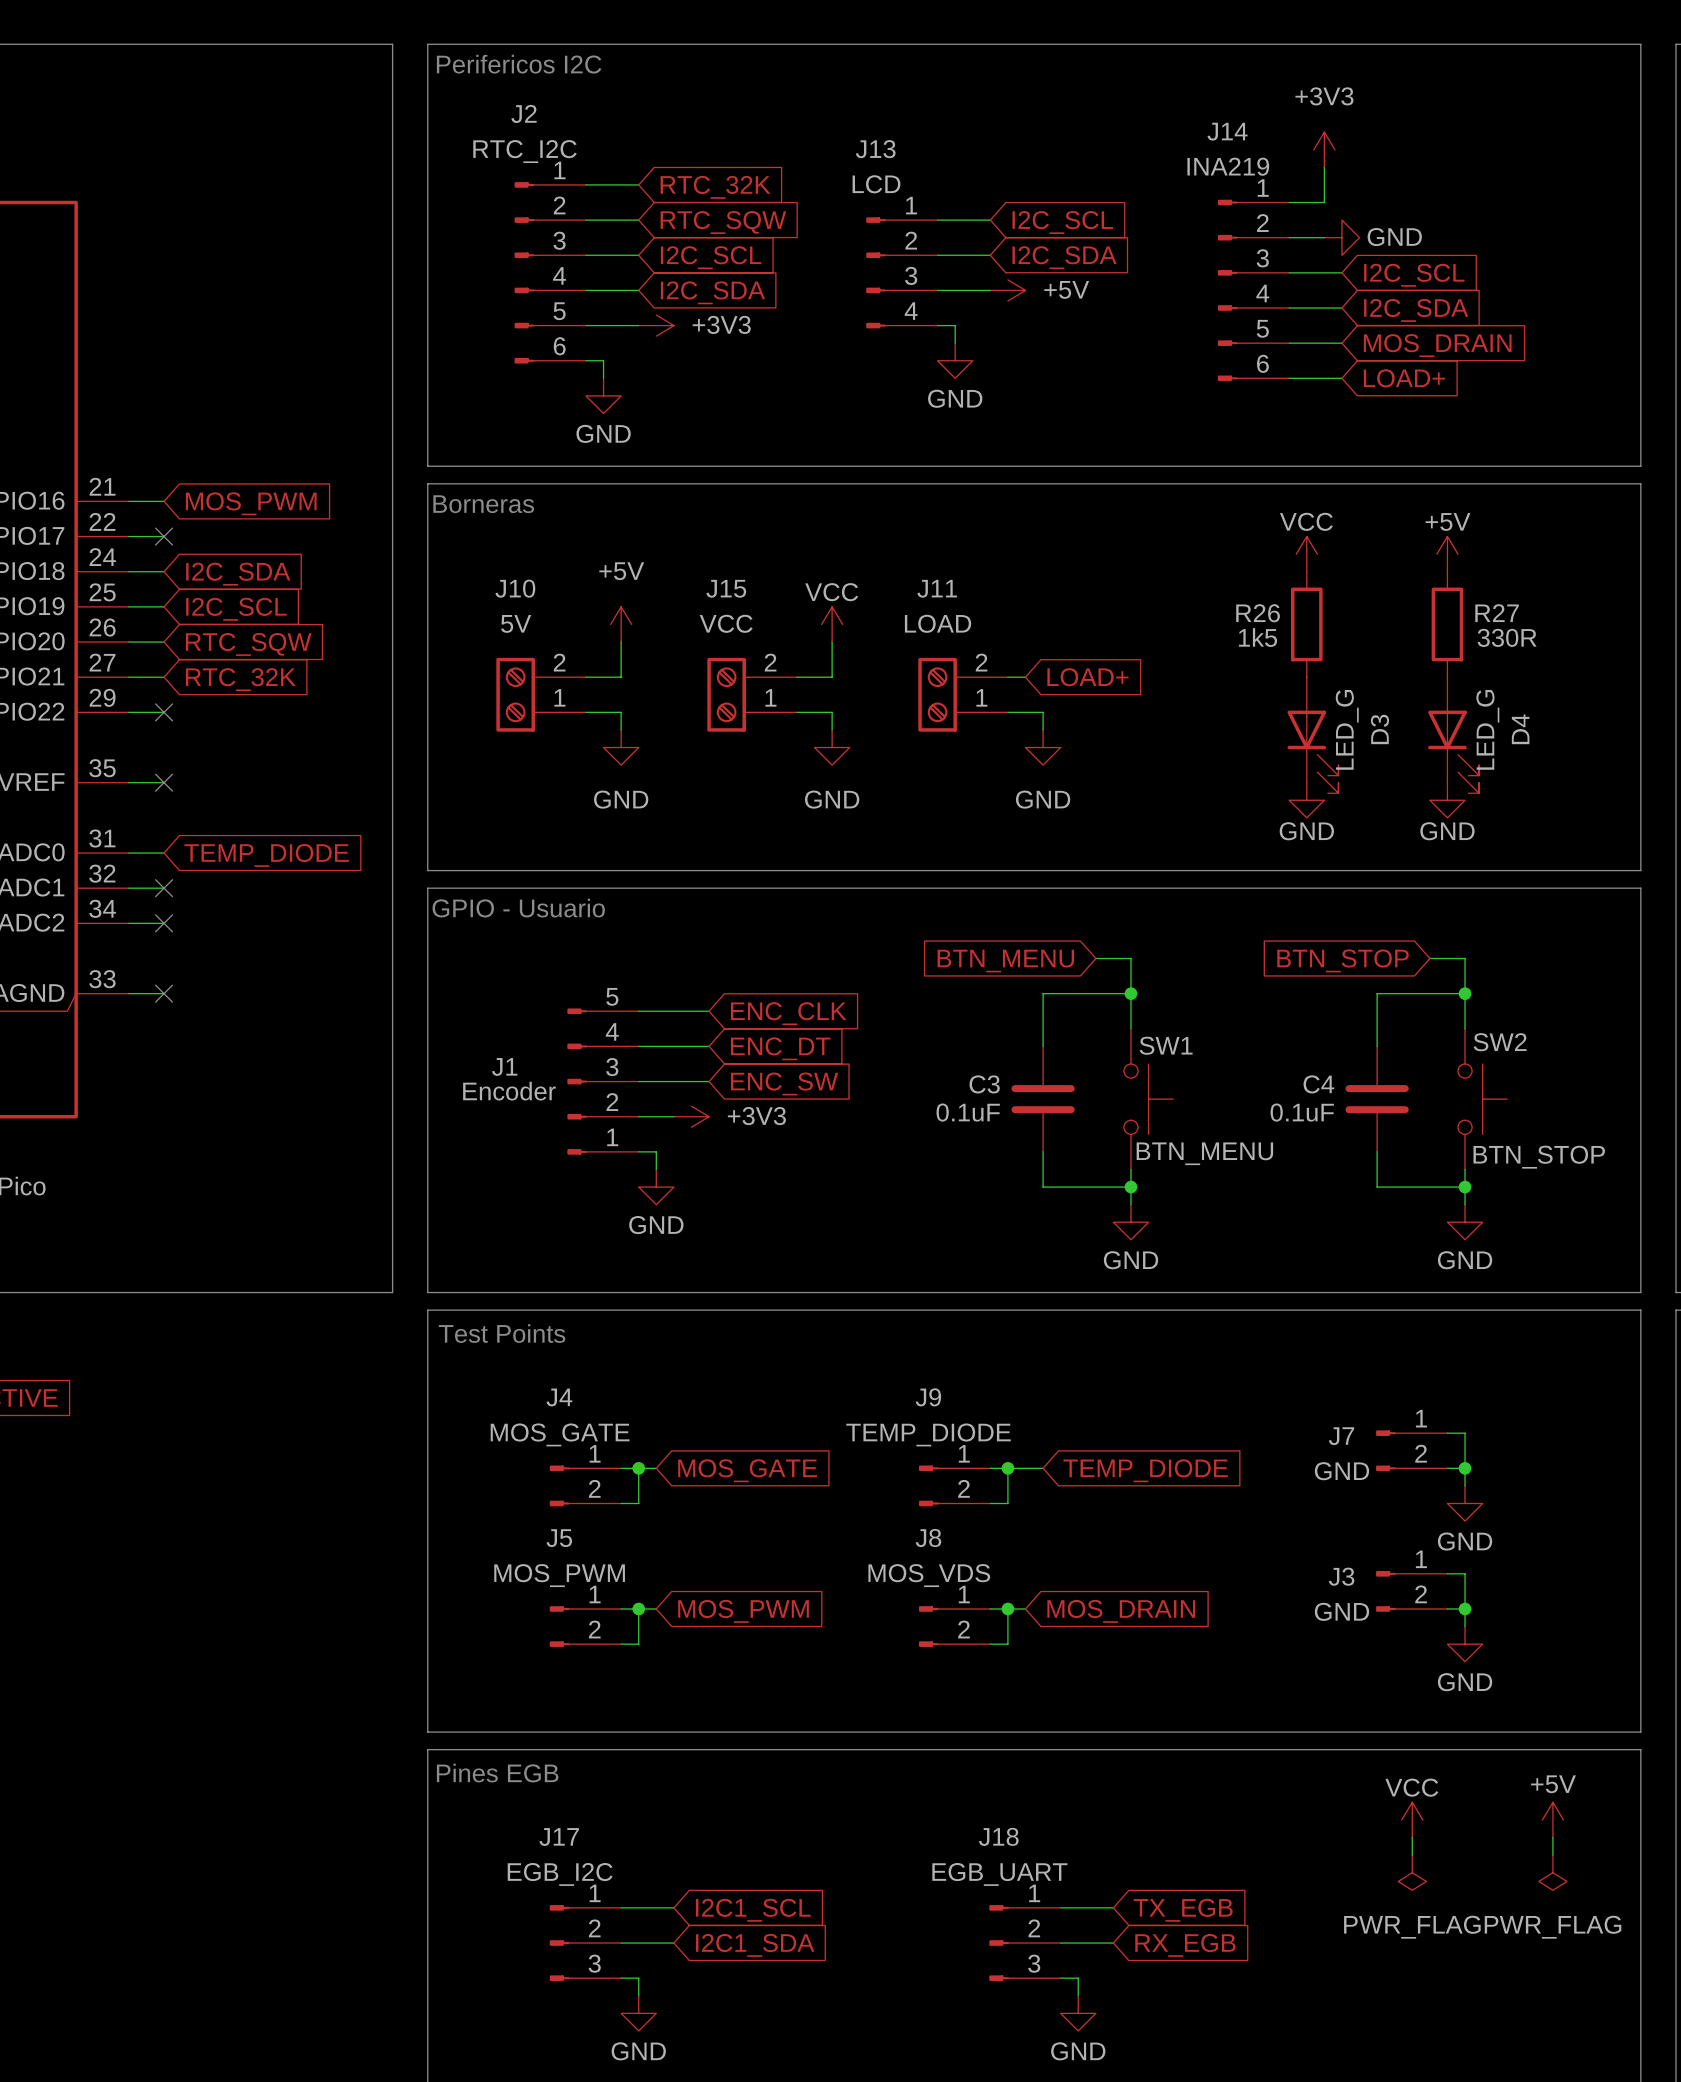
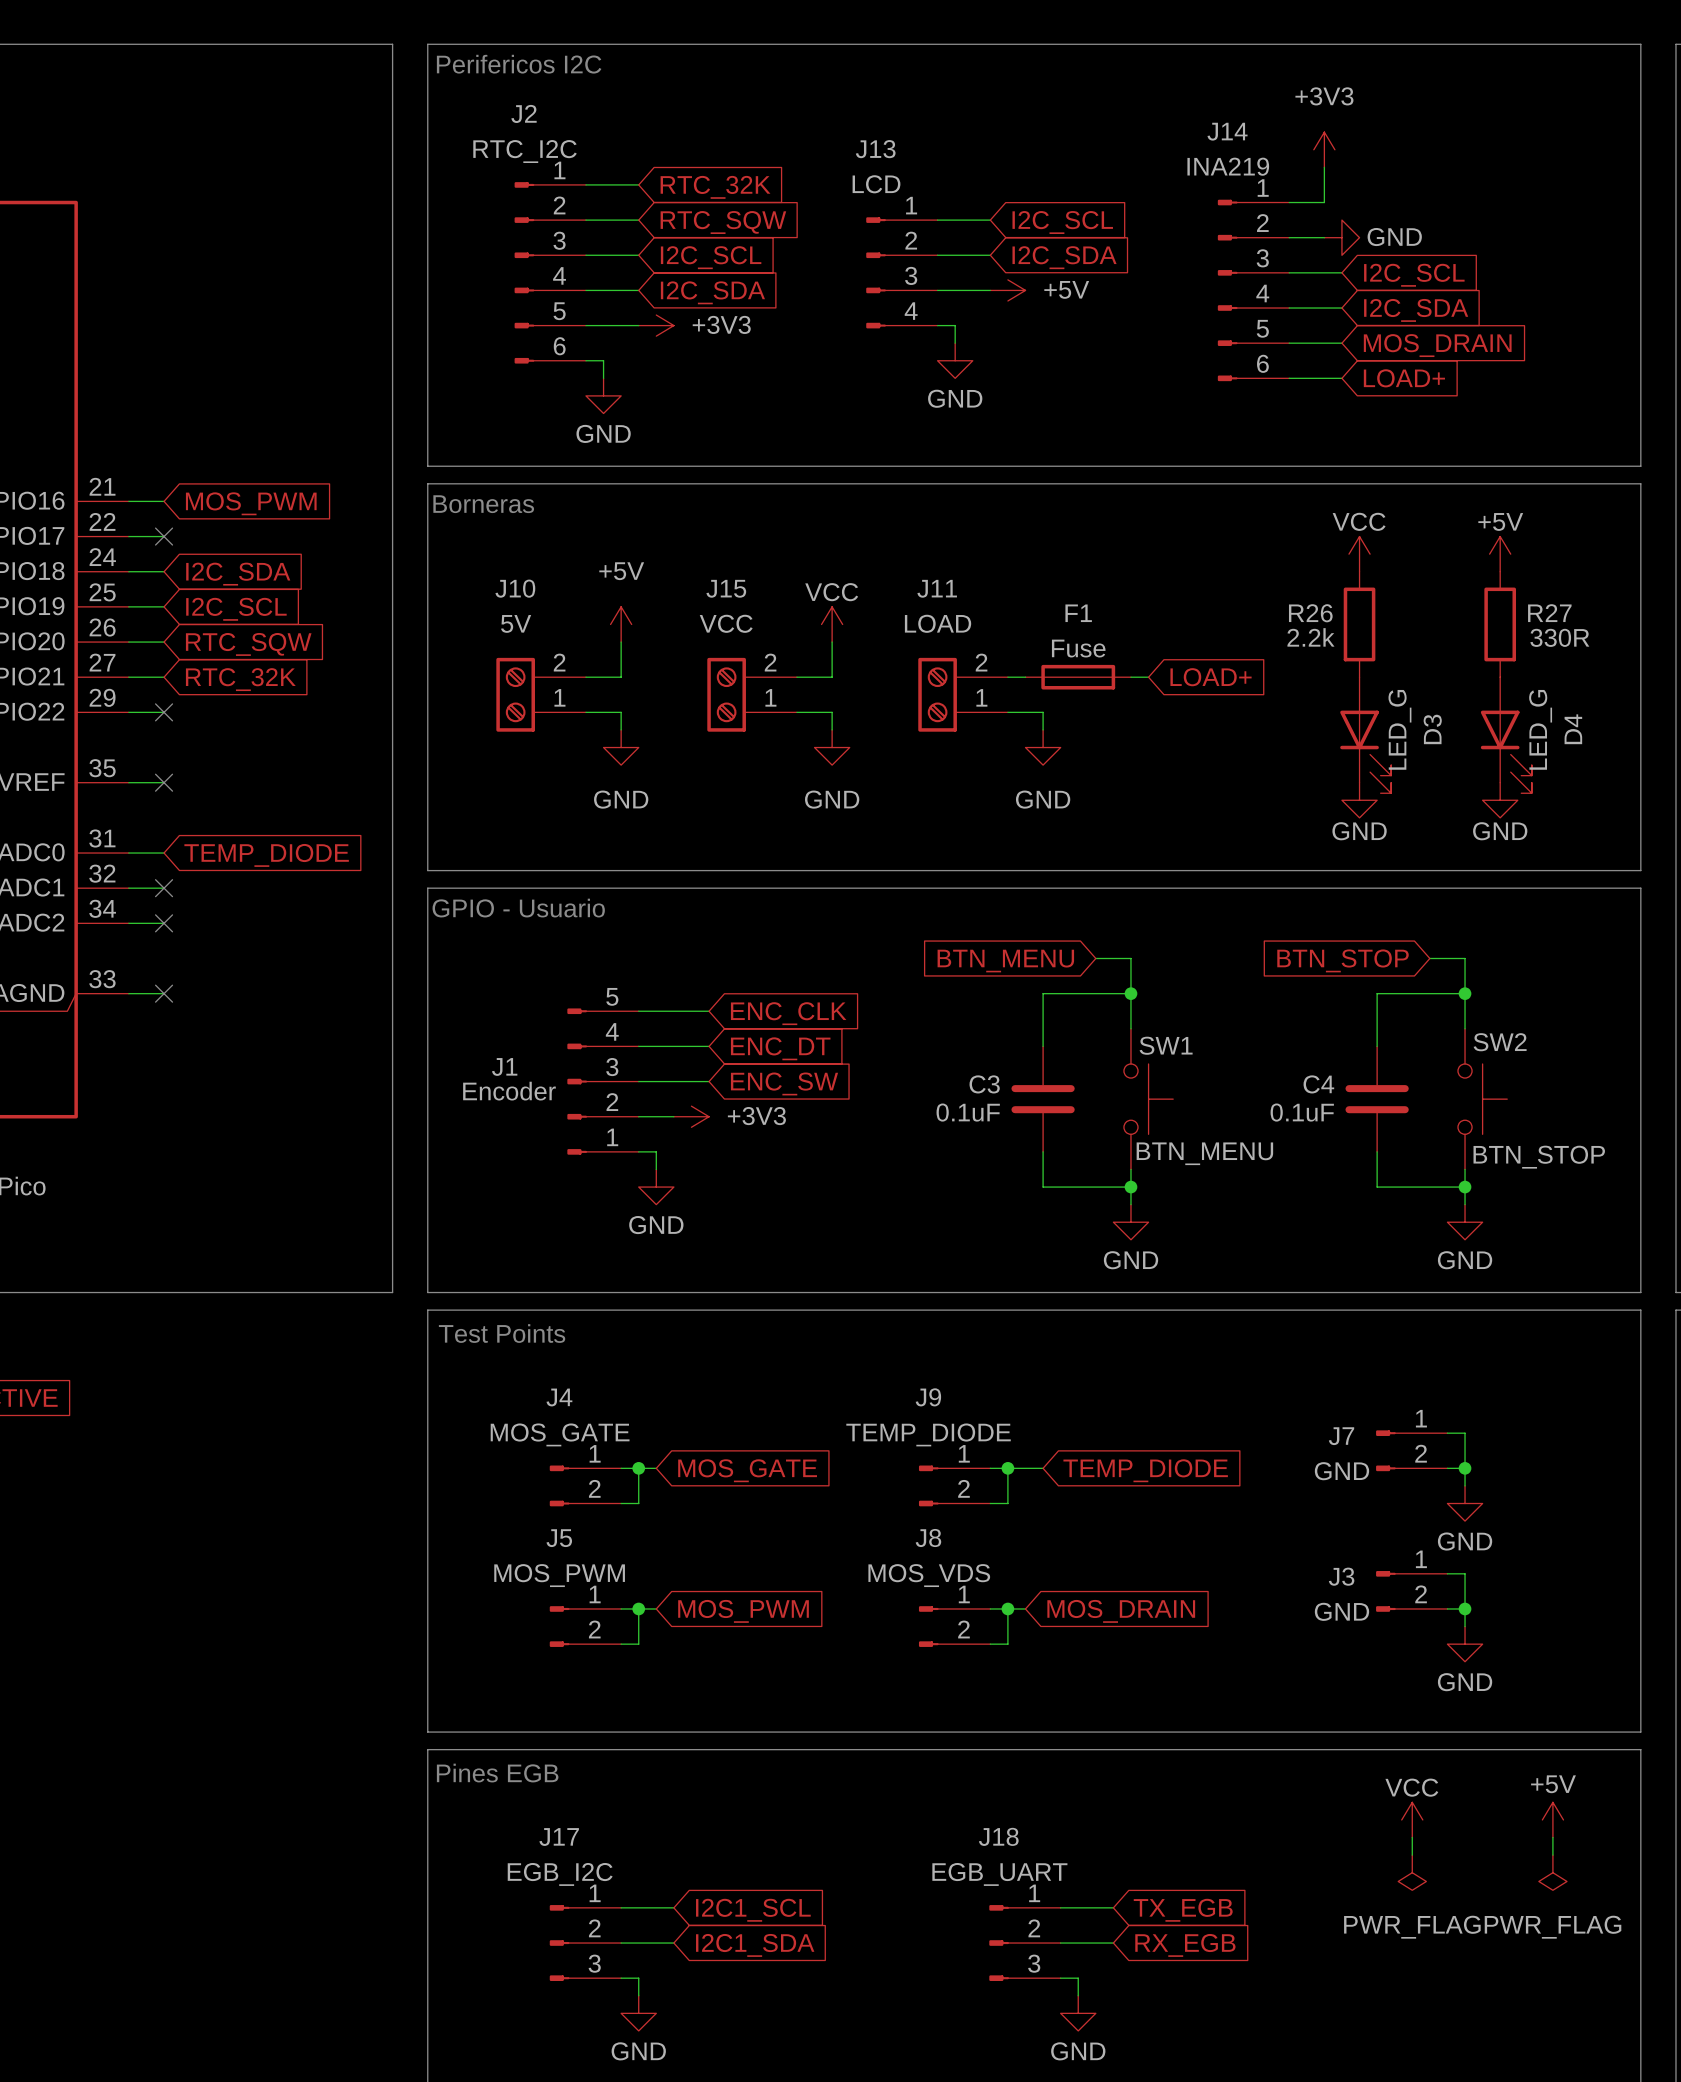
power symbol position: VCC (1306, 554) -> VCC (1359, 554)
power symbol position: +5V (1447, 554) -> +5V (1500, 554)
R26 position: (1306, 624) -> (1359, 624)
R27 position: (1447, 624) -> (1500, 624)
R26 value: 1k5 (1258, 637) -> 2.2k (1310, 637)
F1: none -> Fuse (1078, 677)
global label position: LOAD+ (1087, 677) -> LOAD+ (1211, 677)
wire: none -> (1130, 677) (1148, 677)
D3 position: (1312, 735) -> (1365, 735)
D4 position: (1453, 735) -> (1506, 735)
power symbol: GND (1306, 800) -> none
power symbol: none -> GND (1359, 800)
power symbol: GND (1447, 800) -> none
power symbol: none -> GND (1500, 800)

